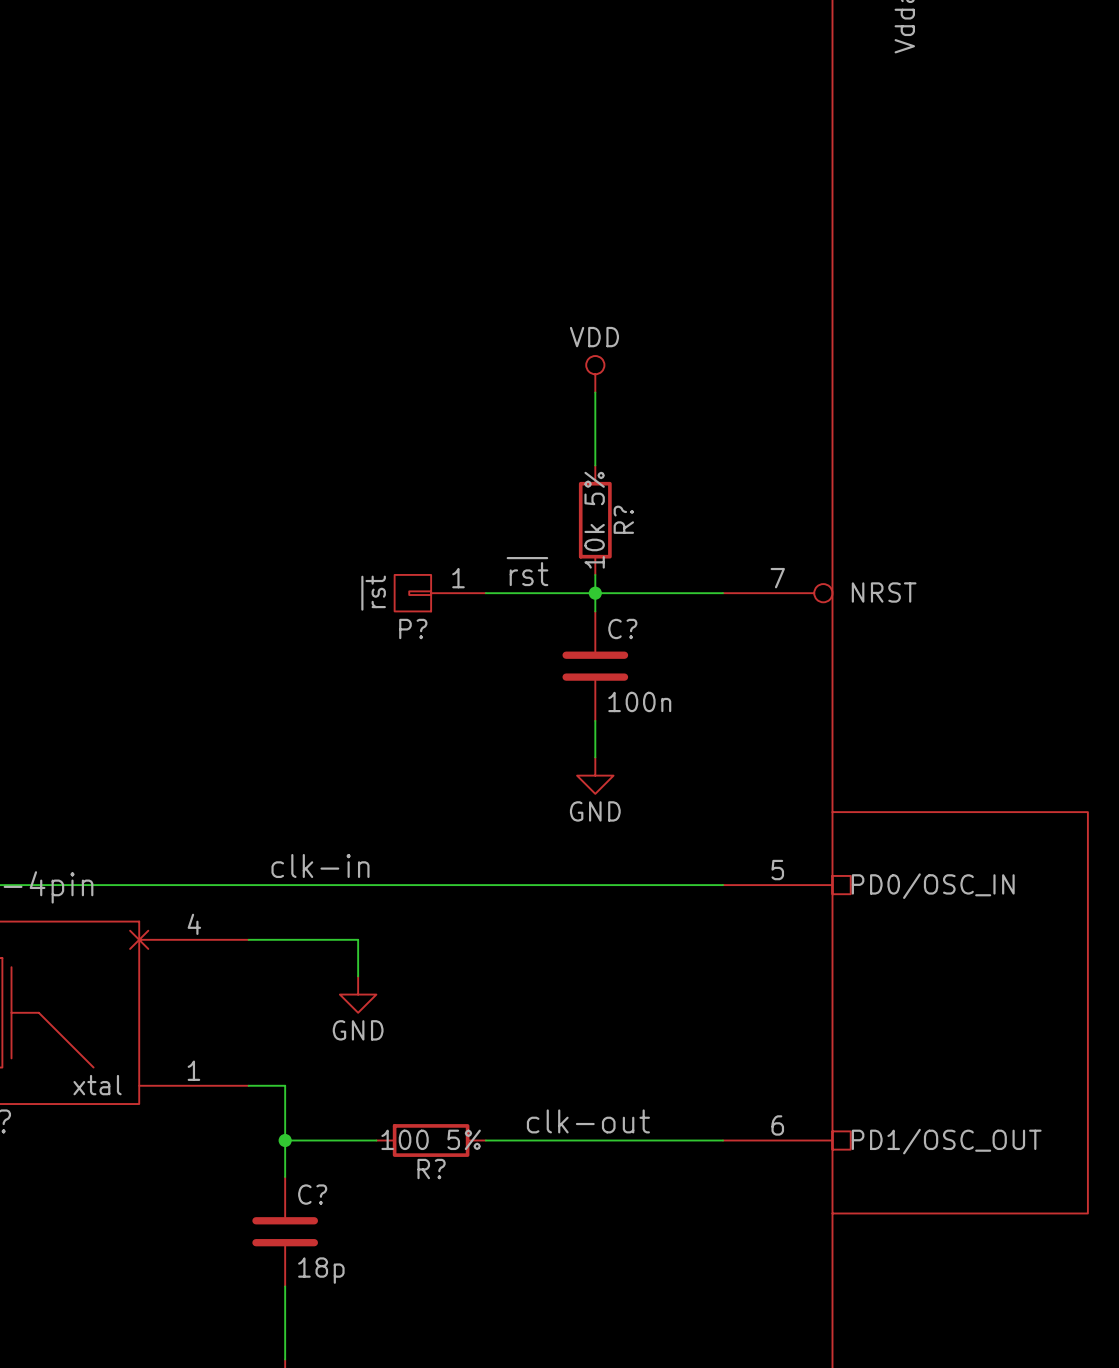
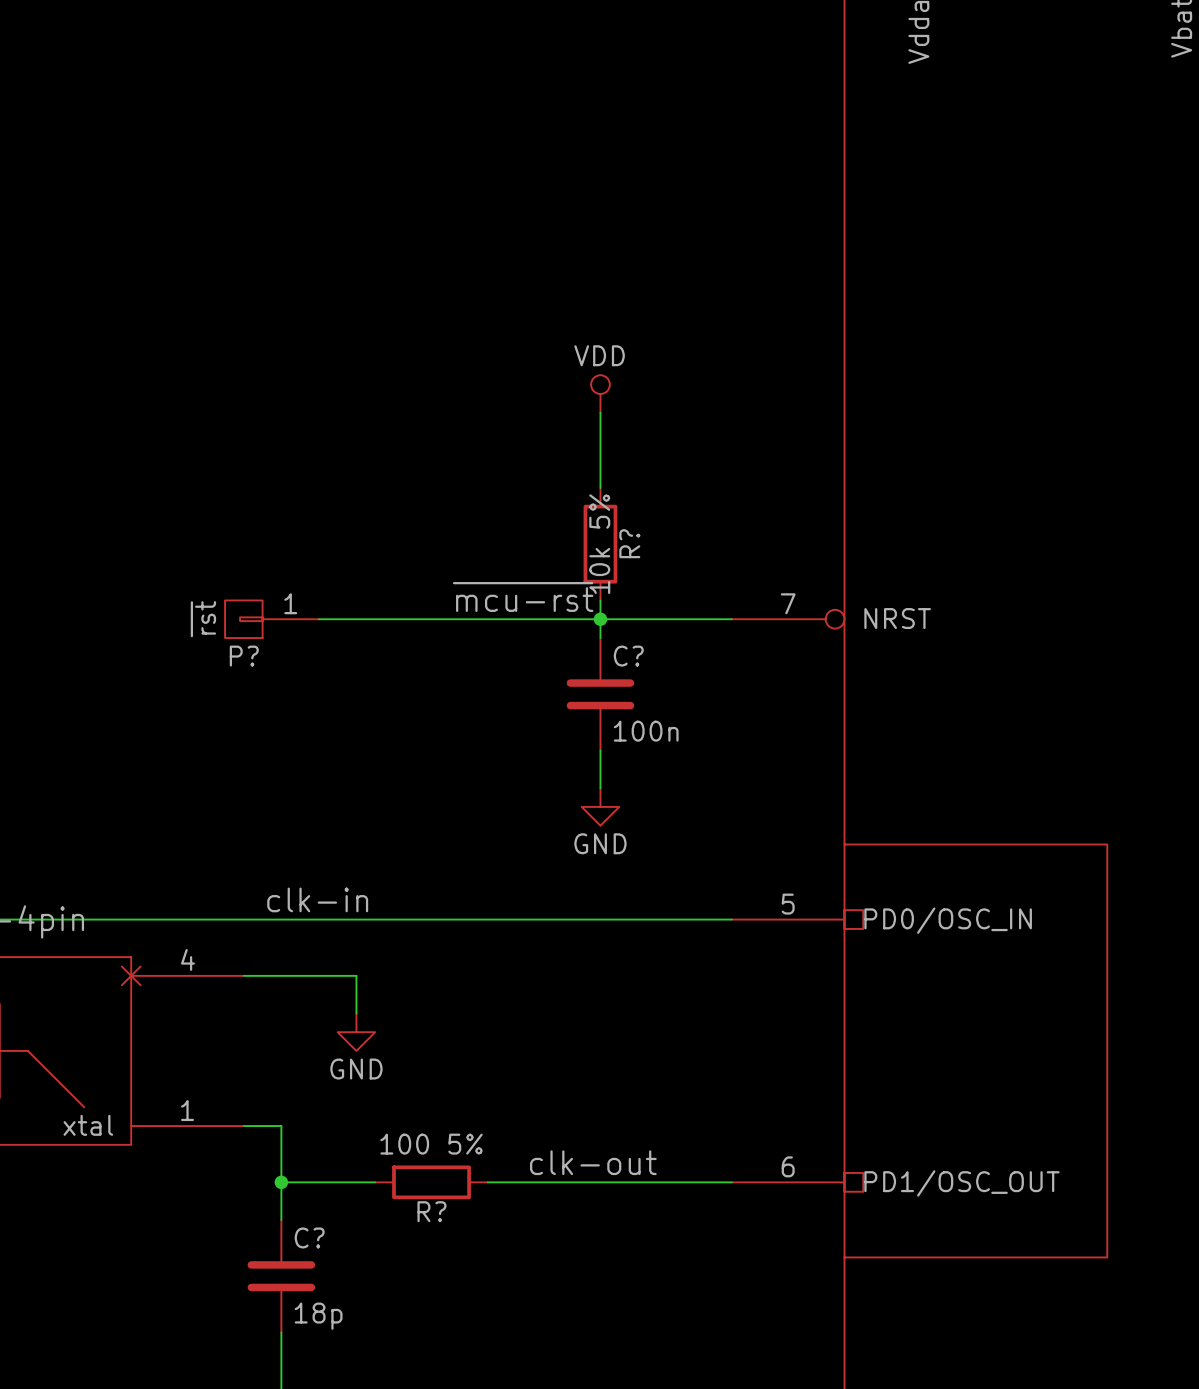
label: ~{rst} (527, 571) -> ~{mcu-rst} (523, 596)
wire: none -> (318, 619) (487, 619)
P? position: (440, 593) -> (271, 619)
R? value position: 100 5% (431, 1139) -> 100 5% (431, 1144)

